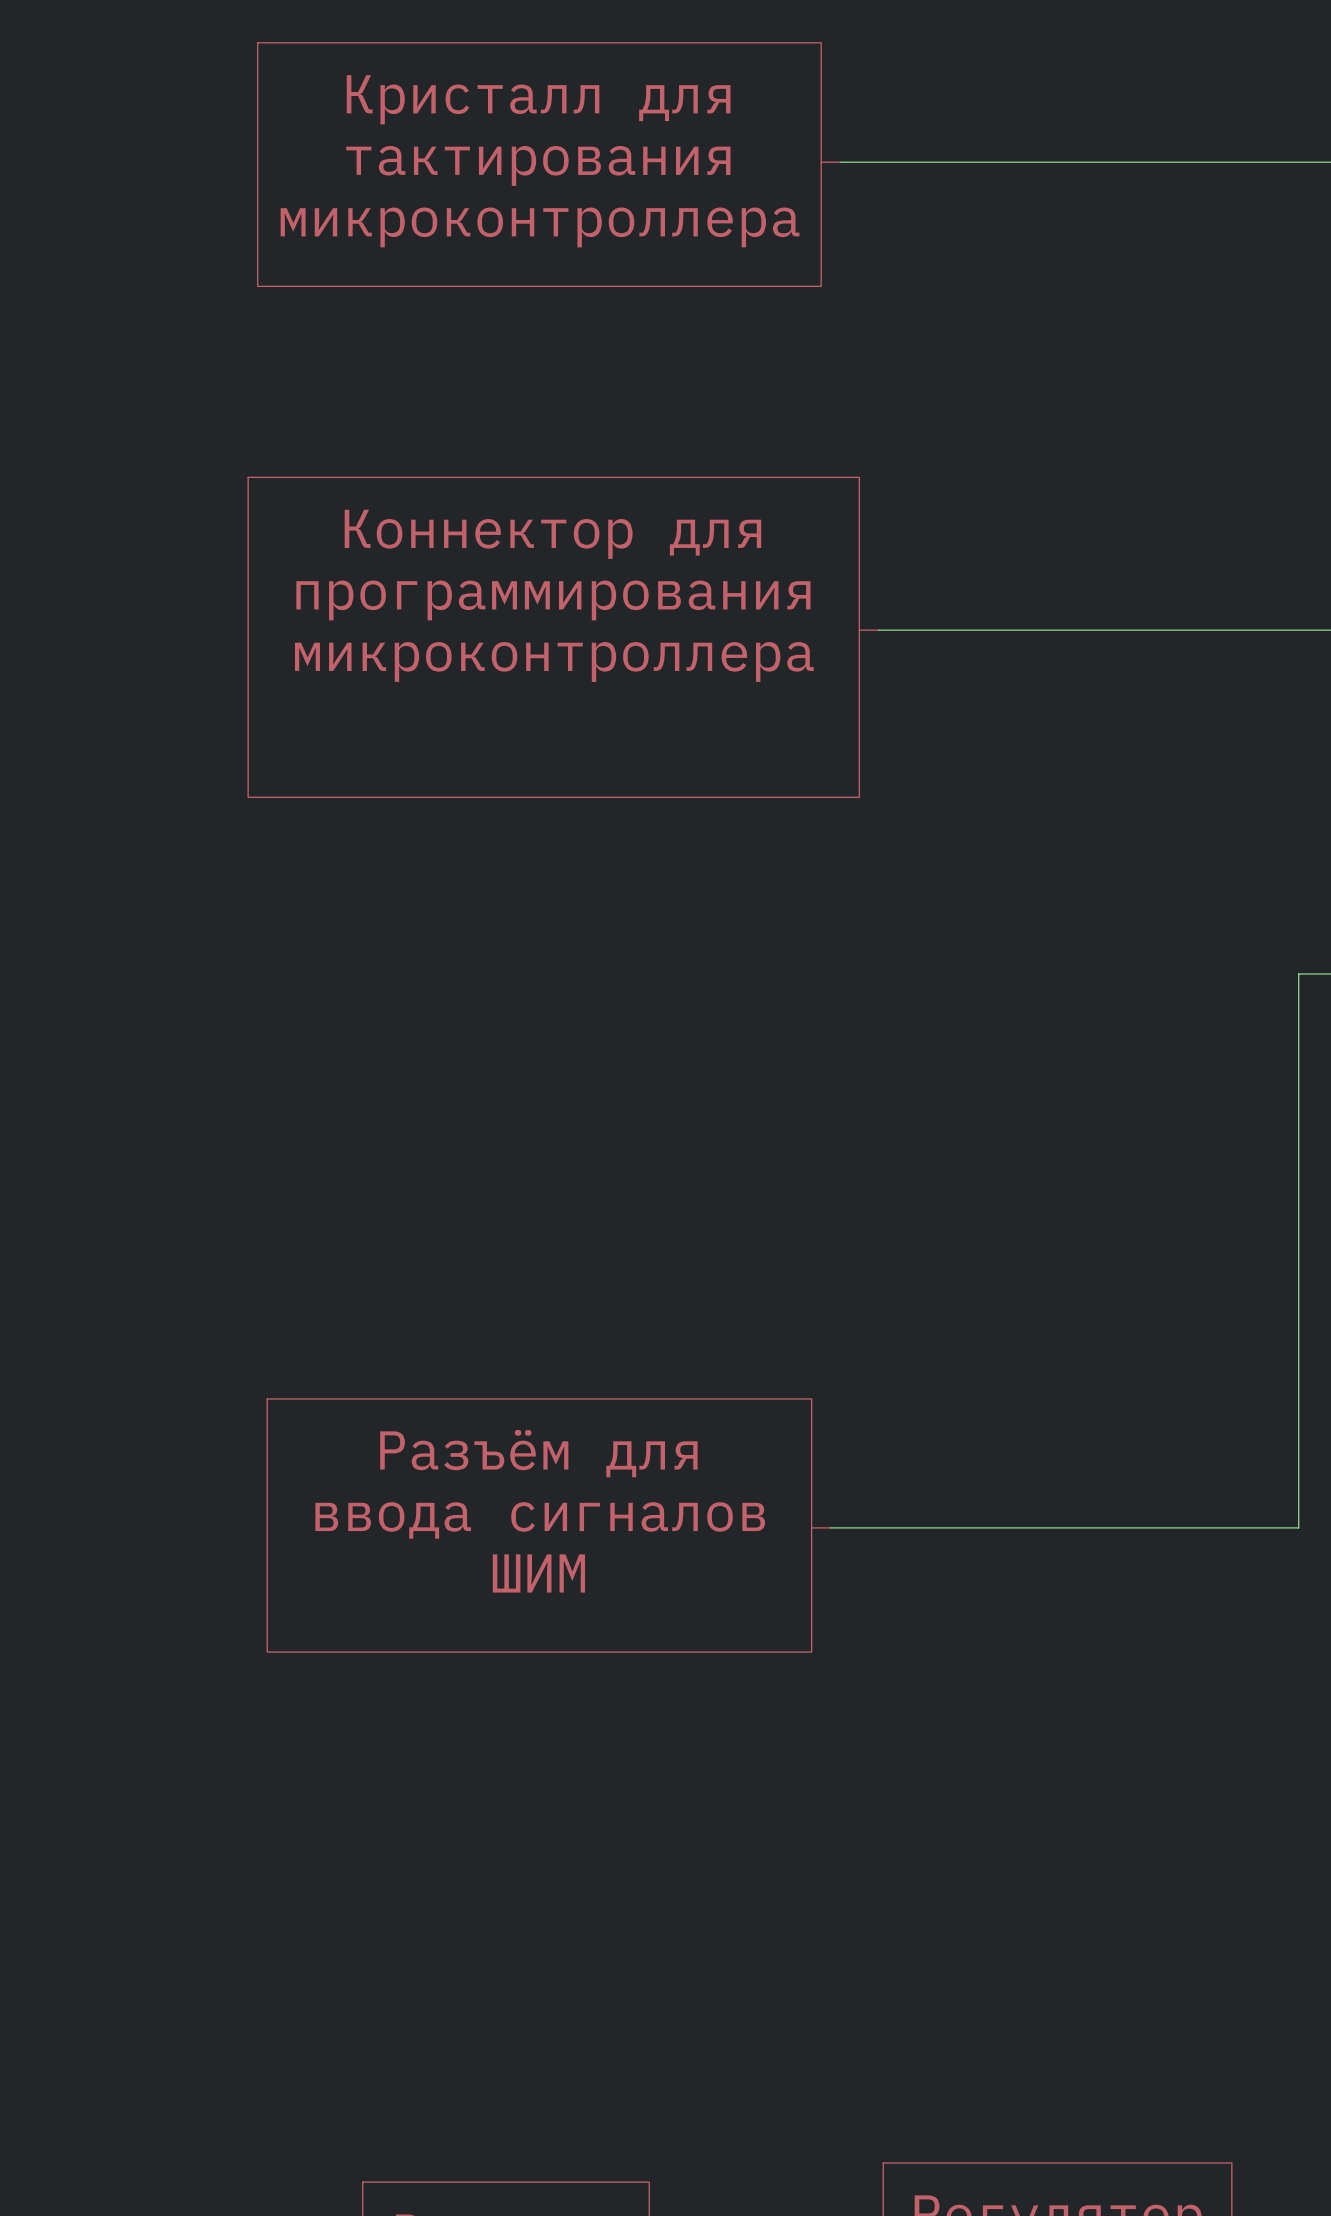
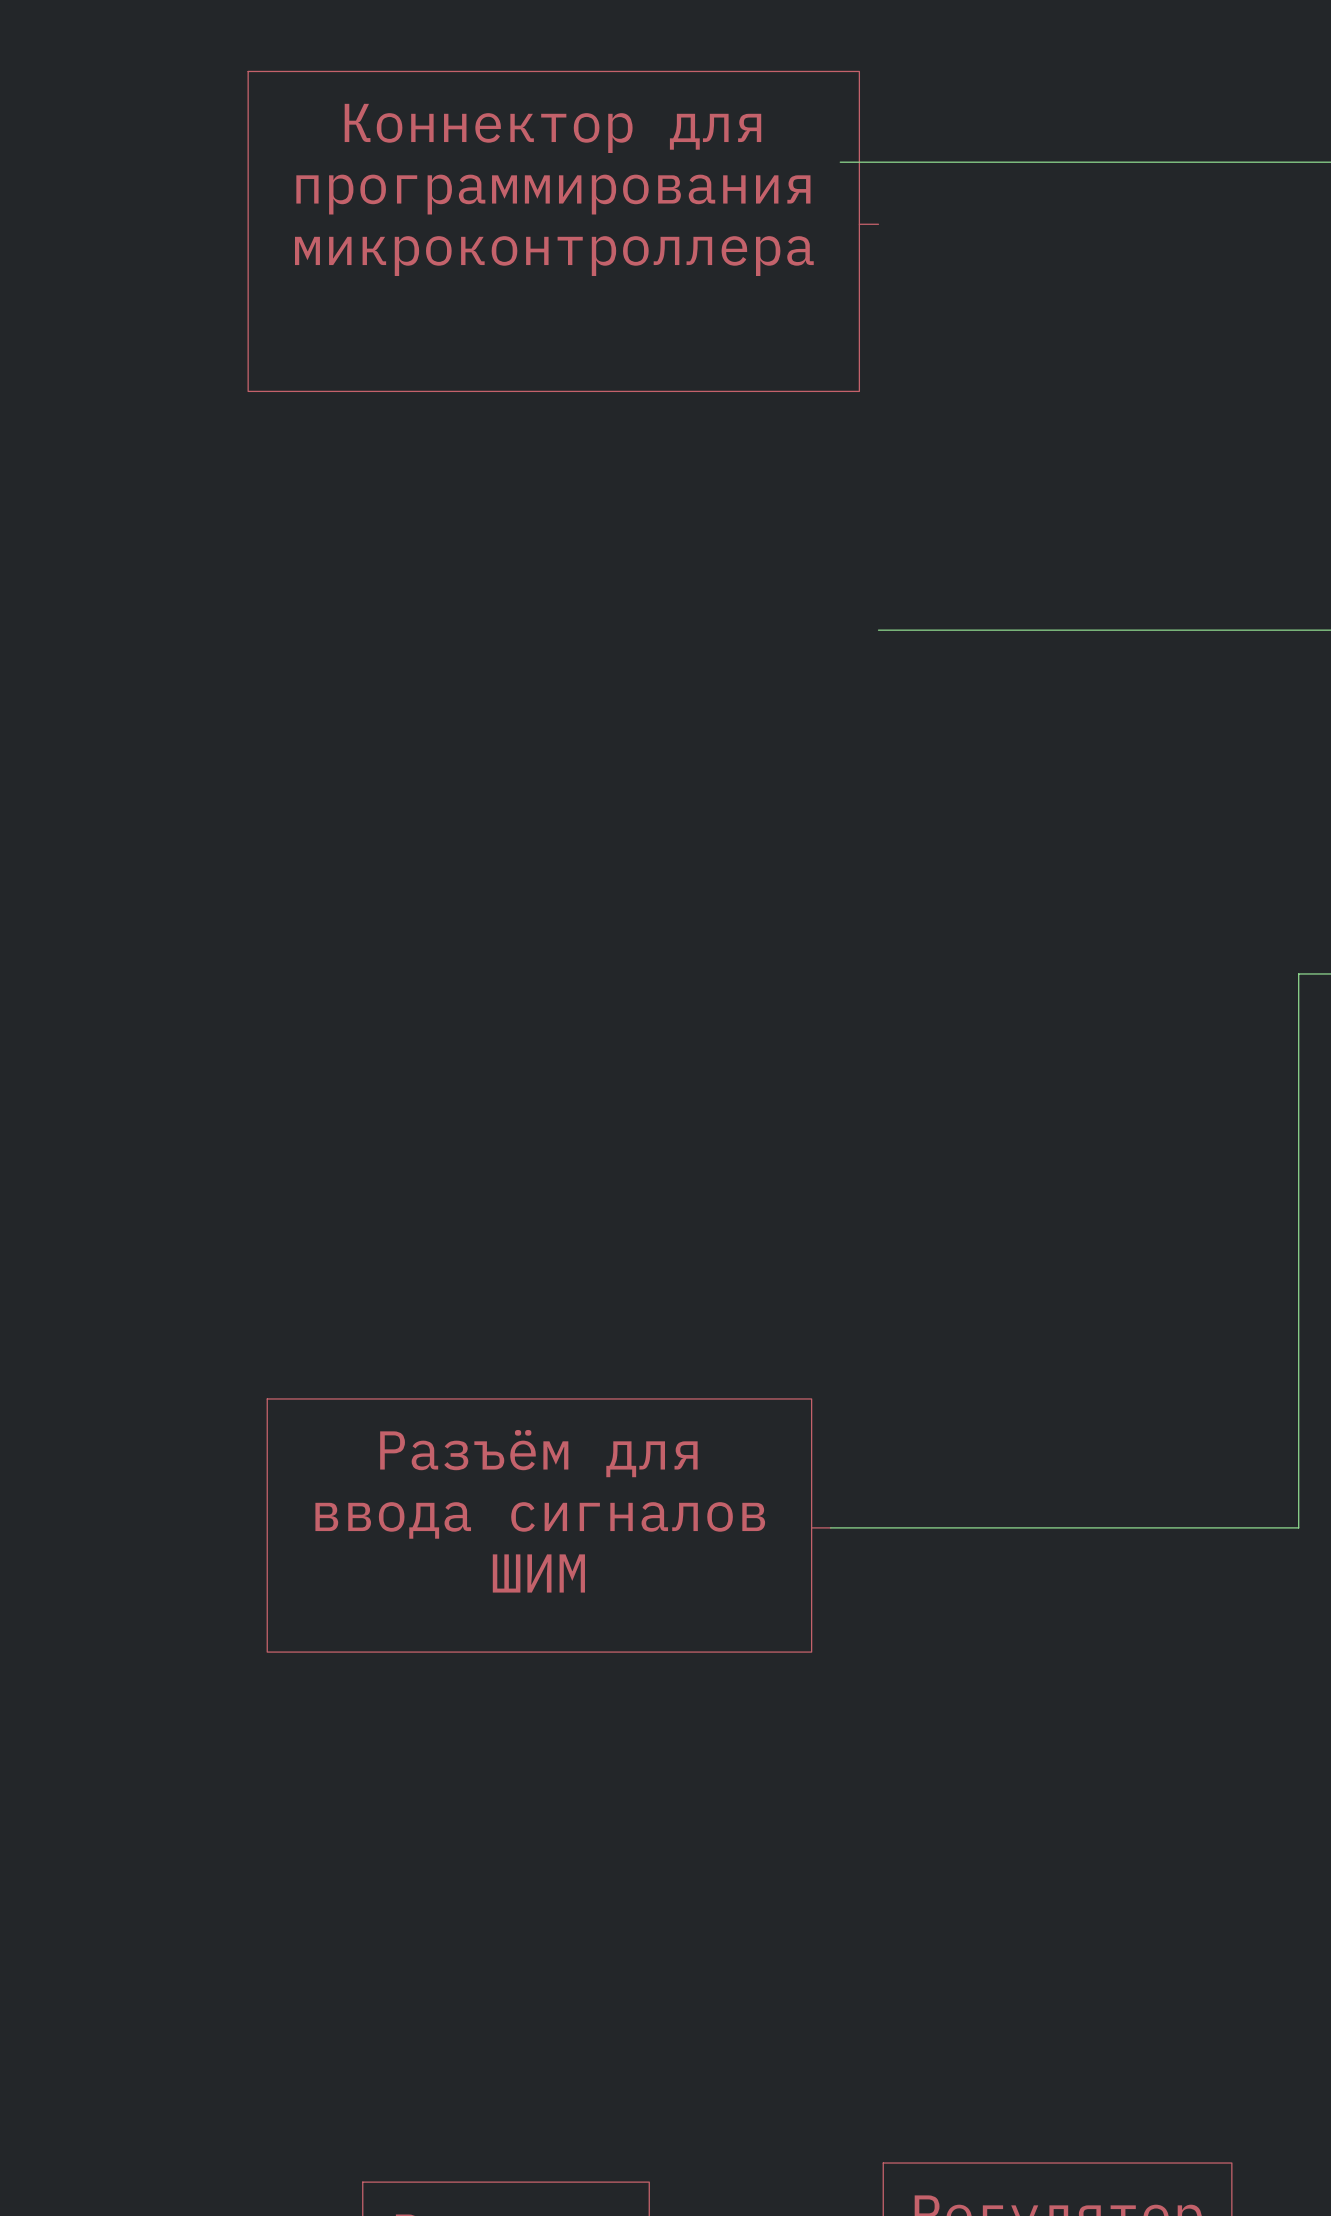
part: (548, 164) -> none
part: none -> (563, 231)
part: (563, 637) -> none

